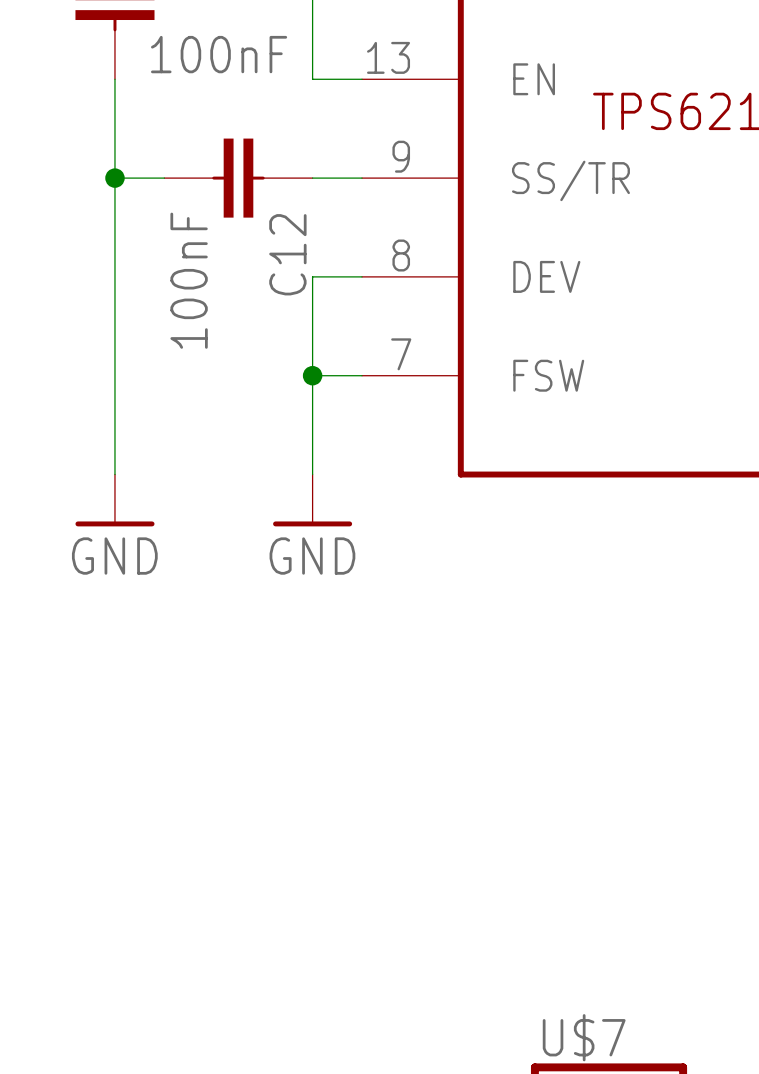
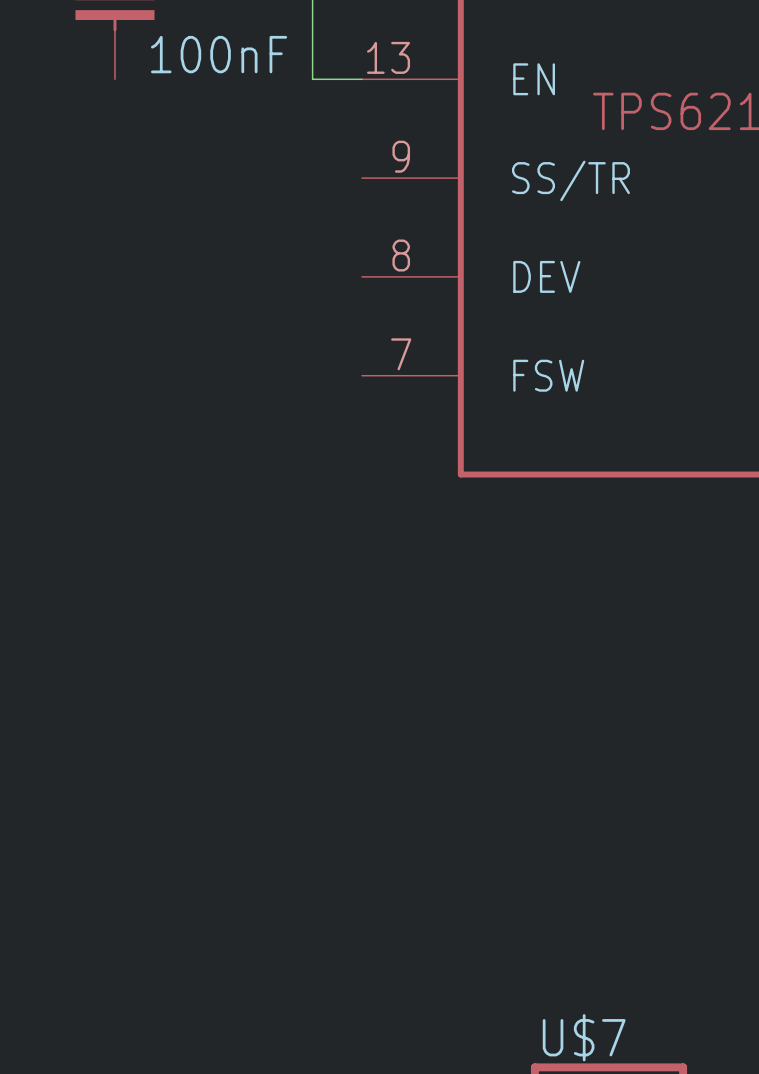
wire: (114, 79) (114, 474) -> none
wire: (114, 178) (164, 178) -> none
junction: (114, 178) -> none
C12: 100nF (238, 178) -> none
wire: (312, 178) (362, 178) -> none
wire: (362, 276) (312, 276) (312, 474) -> none
wire: (312, 375) (362, 375) -> none
junction: (312, 375) -> none
power symbol: GND (114, 500) -> none
power symbol: GND (312, 500) -> none

